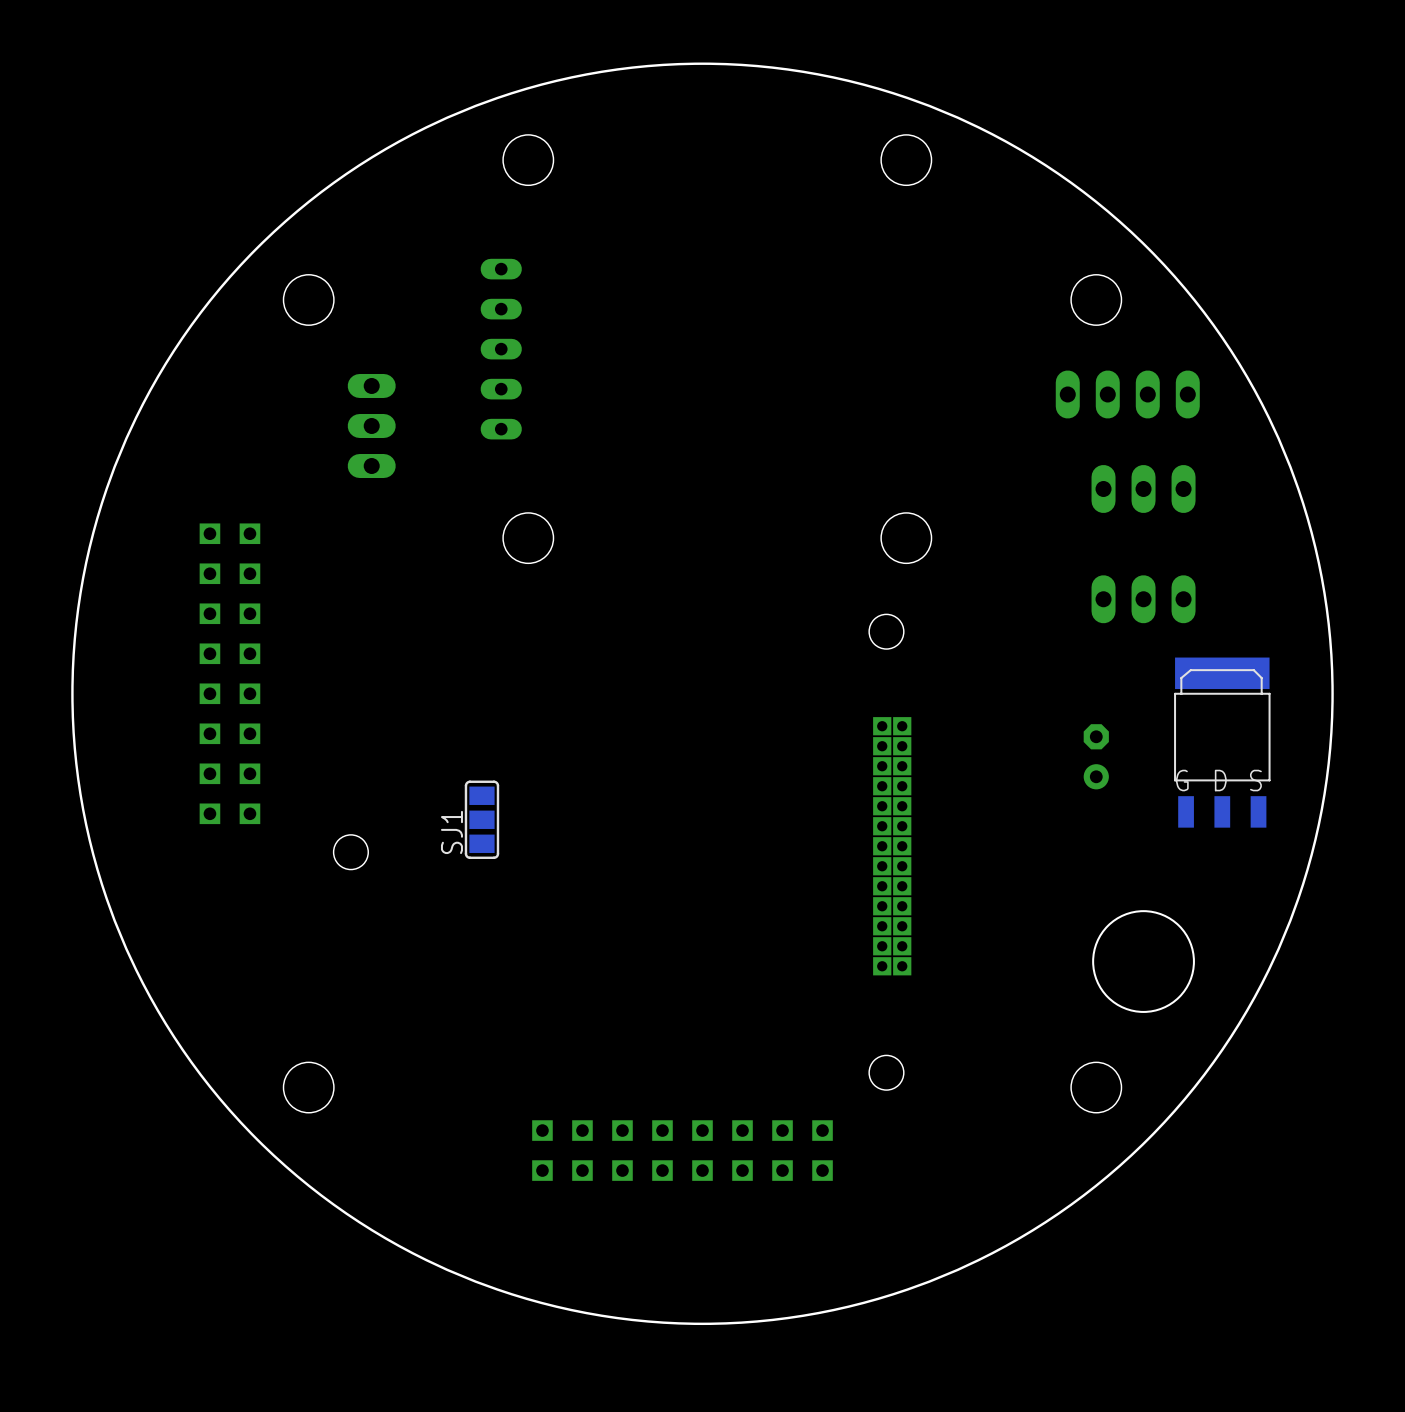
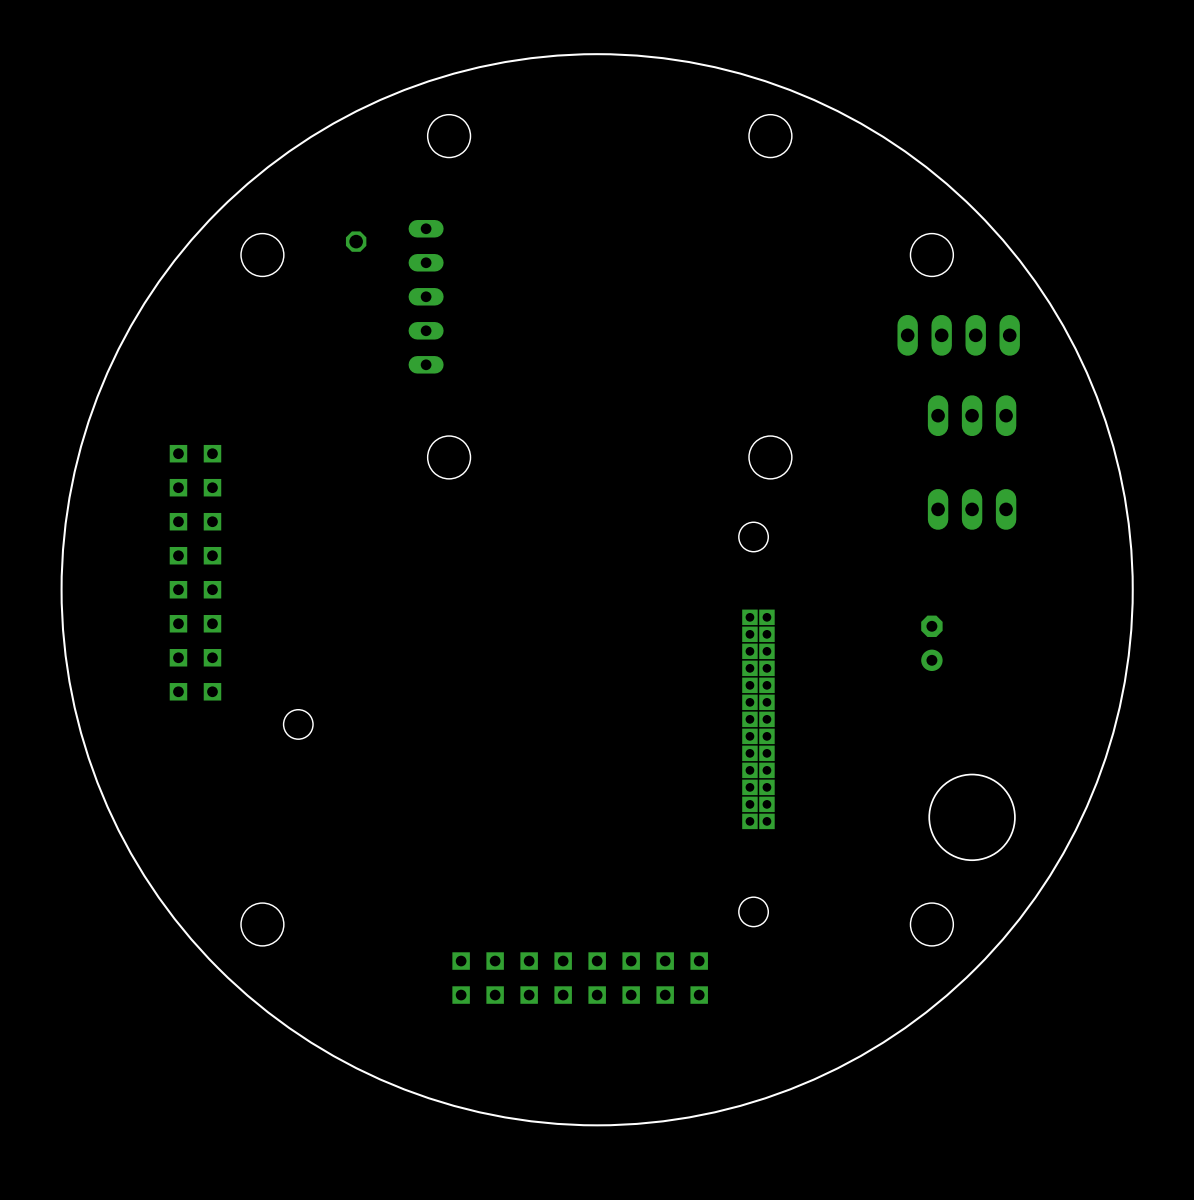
part: none -> (356, 241)
part: (371, 425) -> none
part: (1222, 742) -> none
SJ1: (481, 819) -> none

